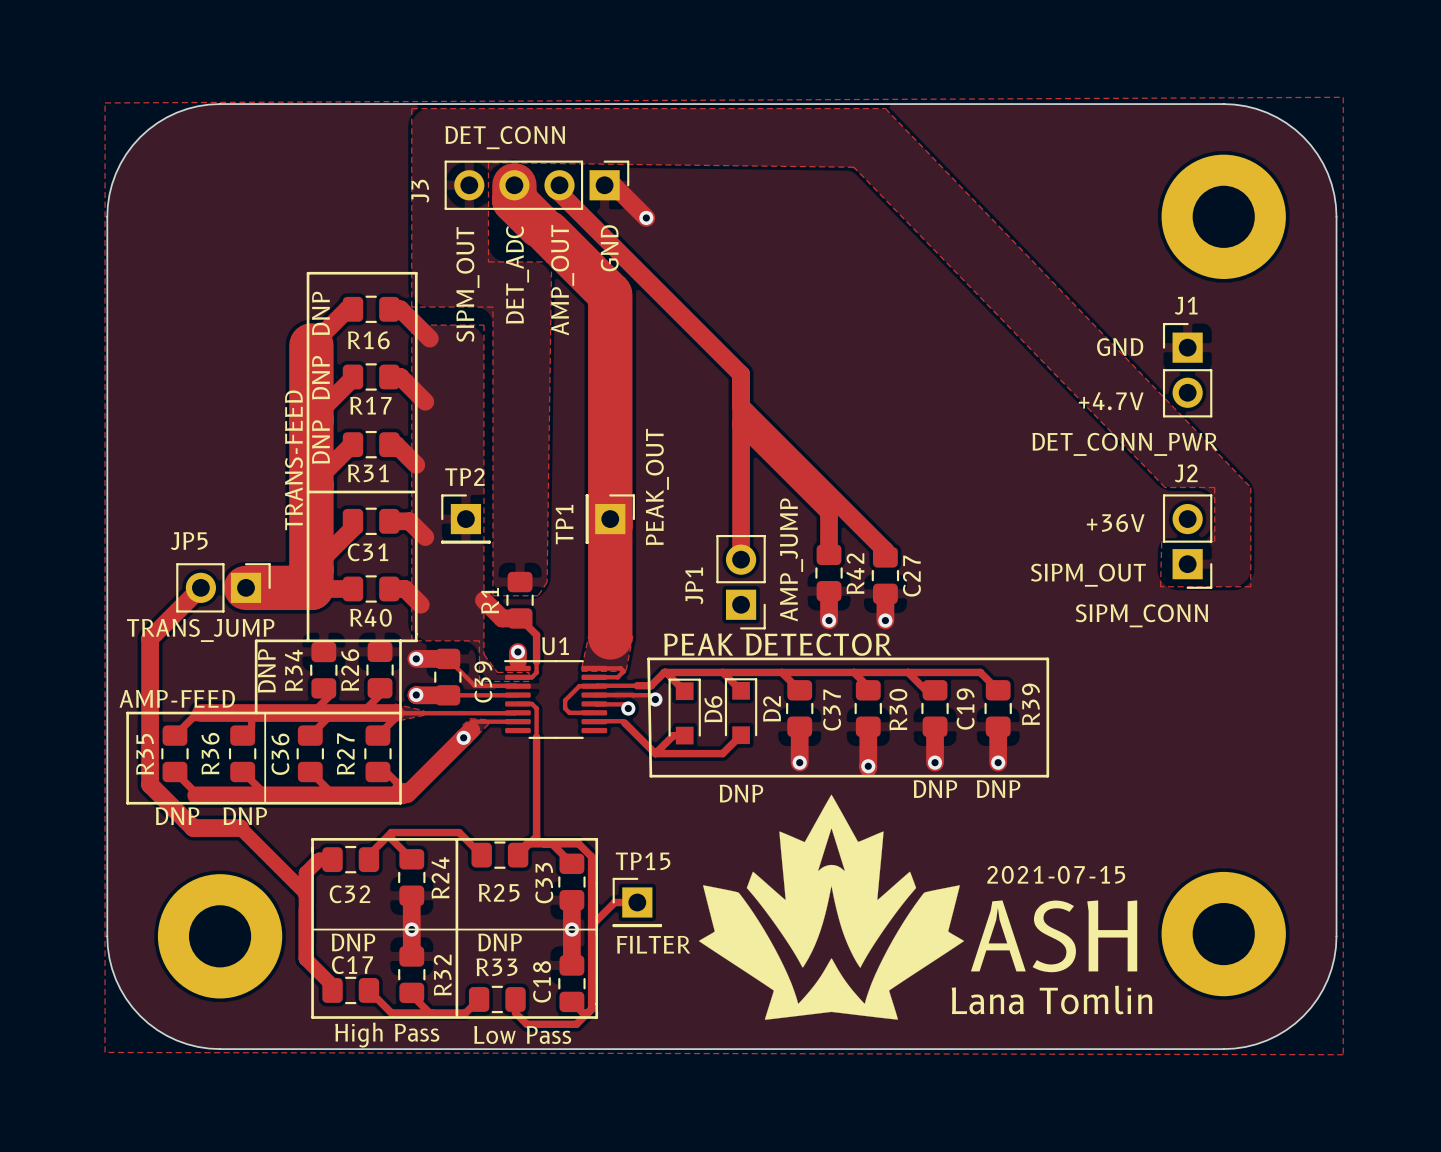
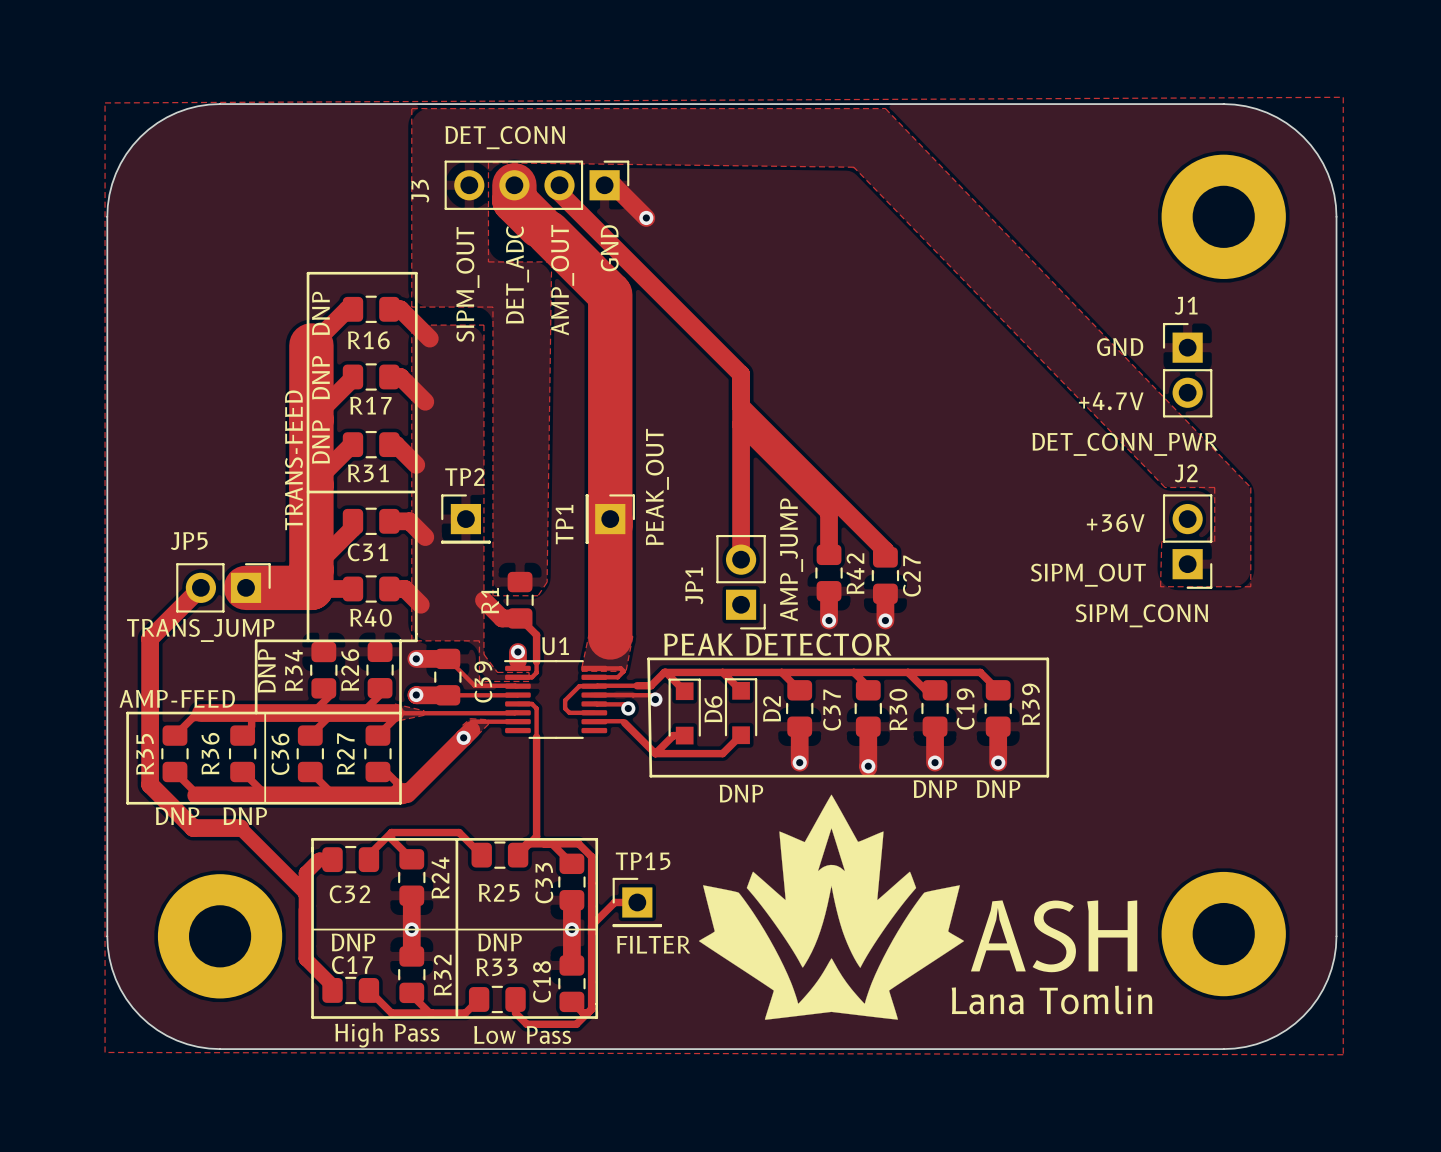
text: 2021-07-15 (1056, 874) -> none

